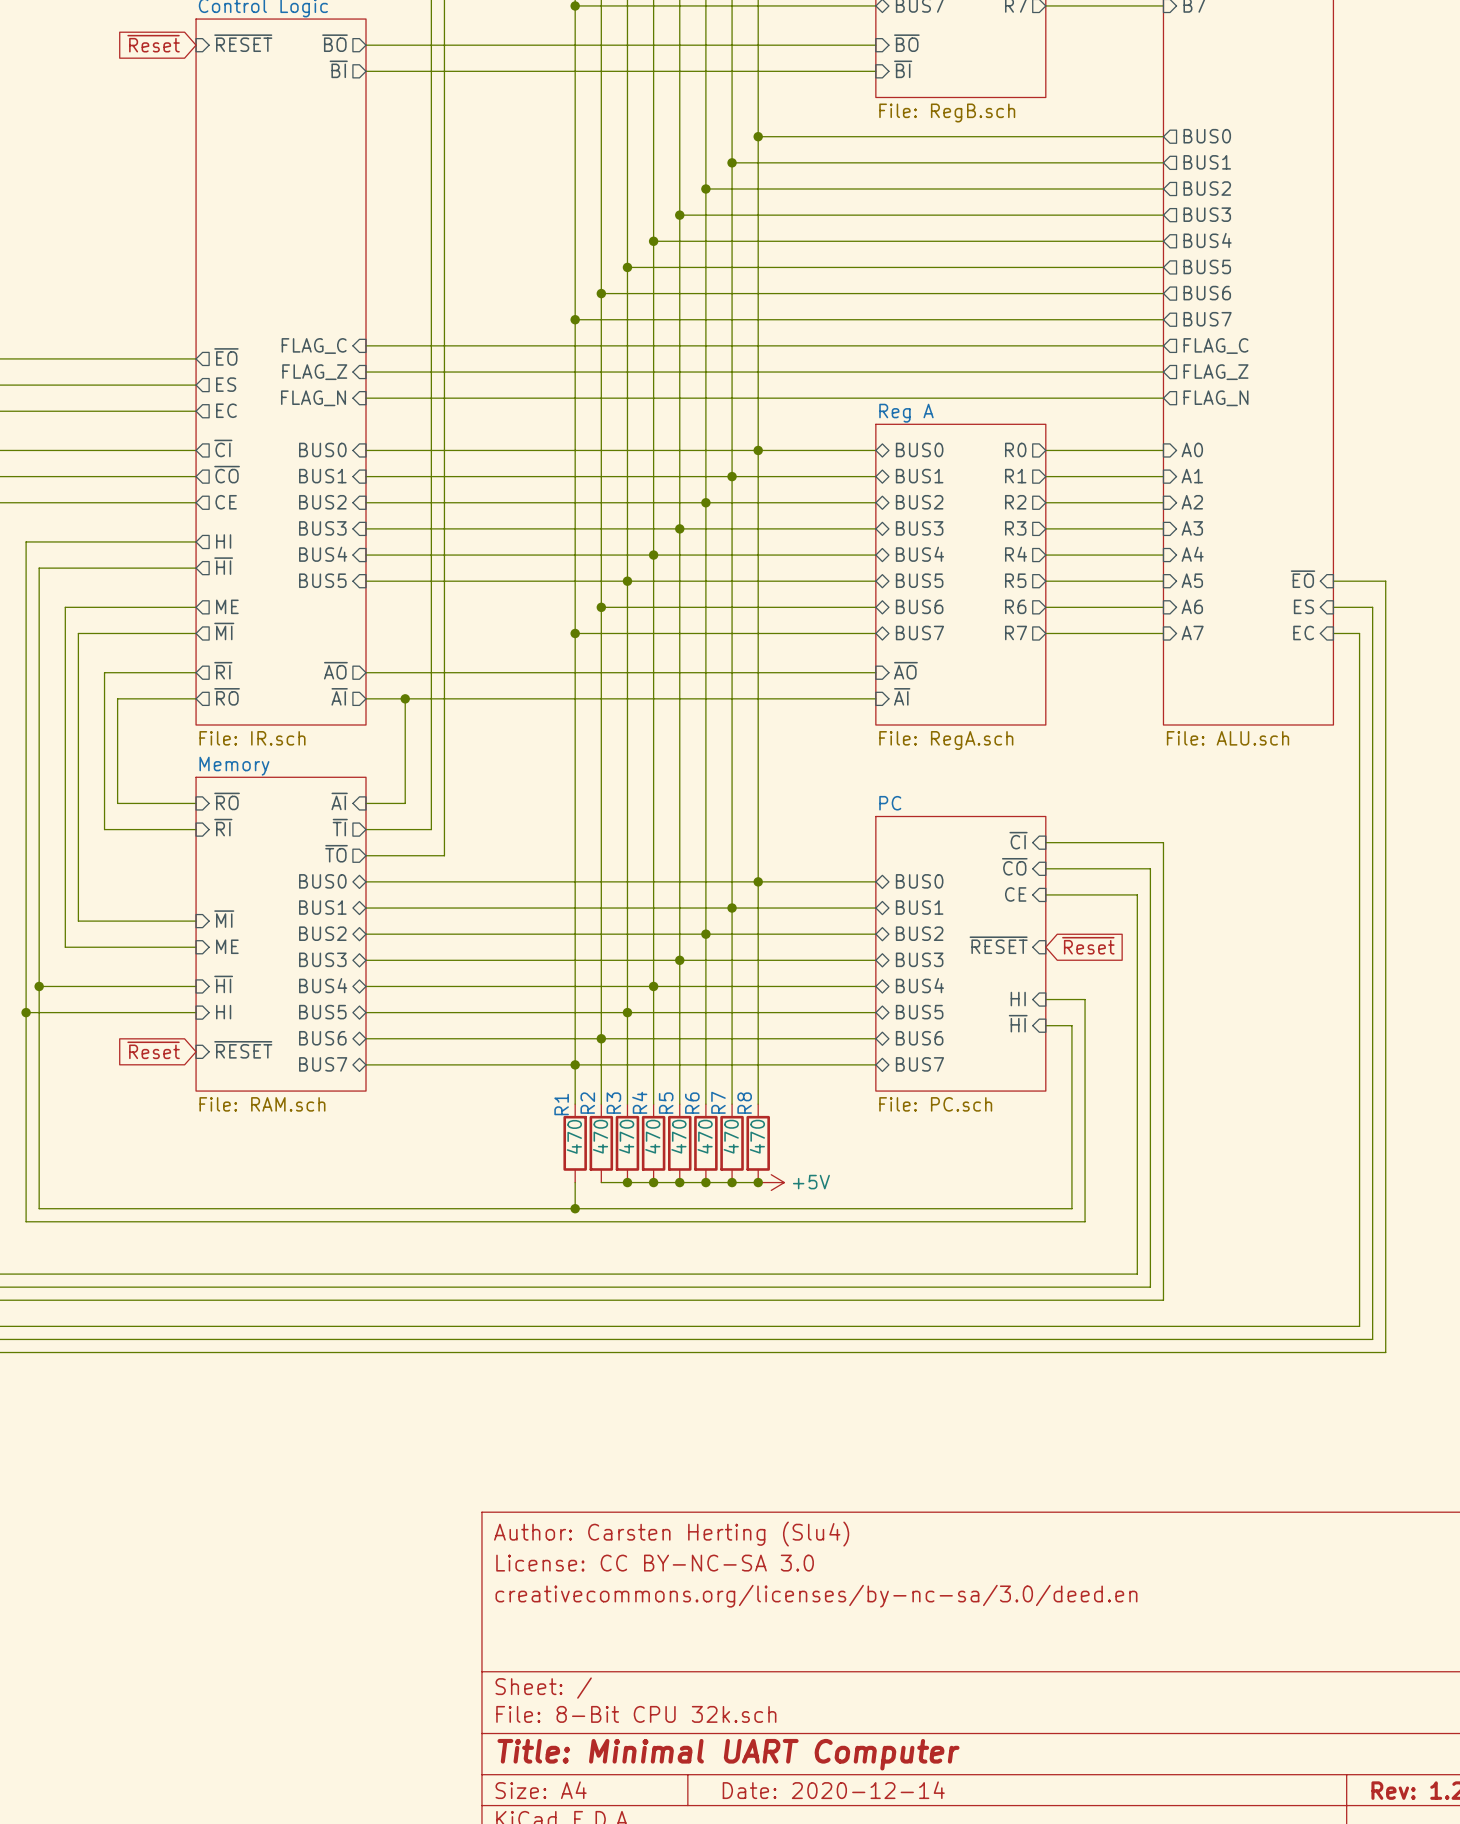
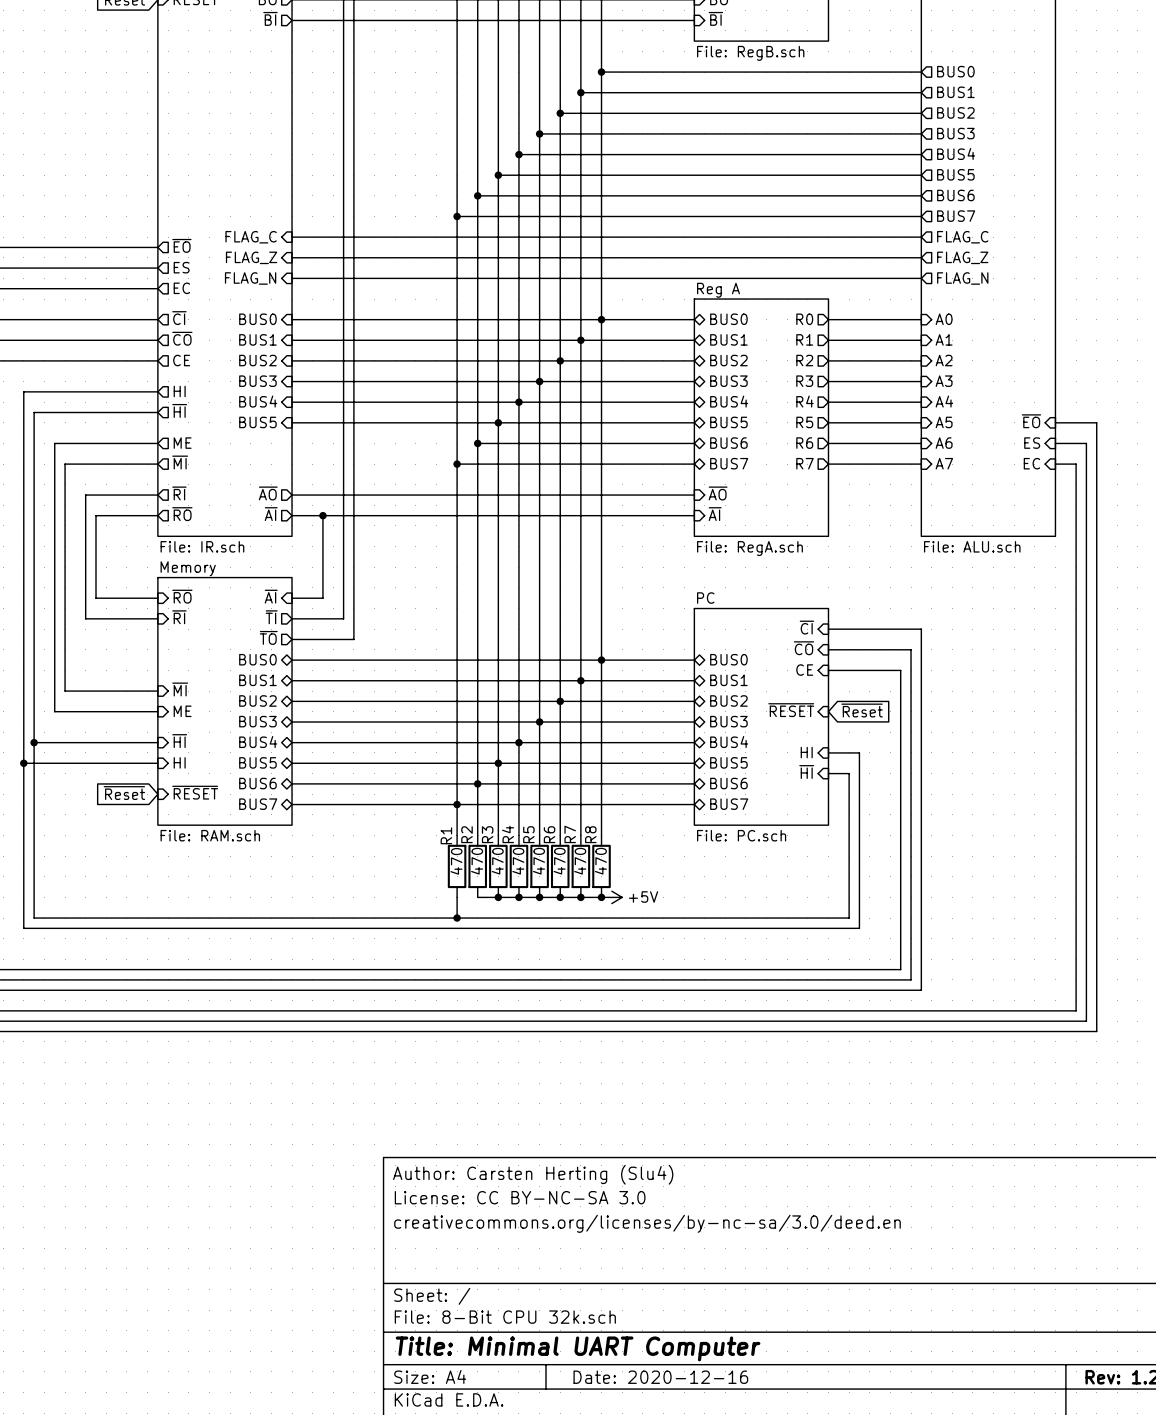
title block: Date: 2020-12-14 (833, 1790) -> Date: 2020-12-16 (660, 1377)

